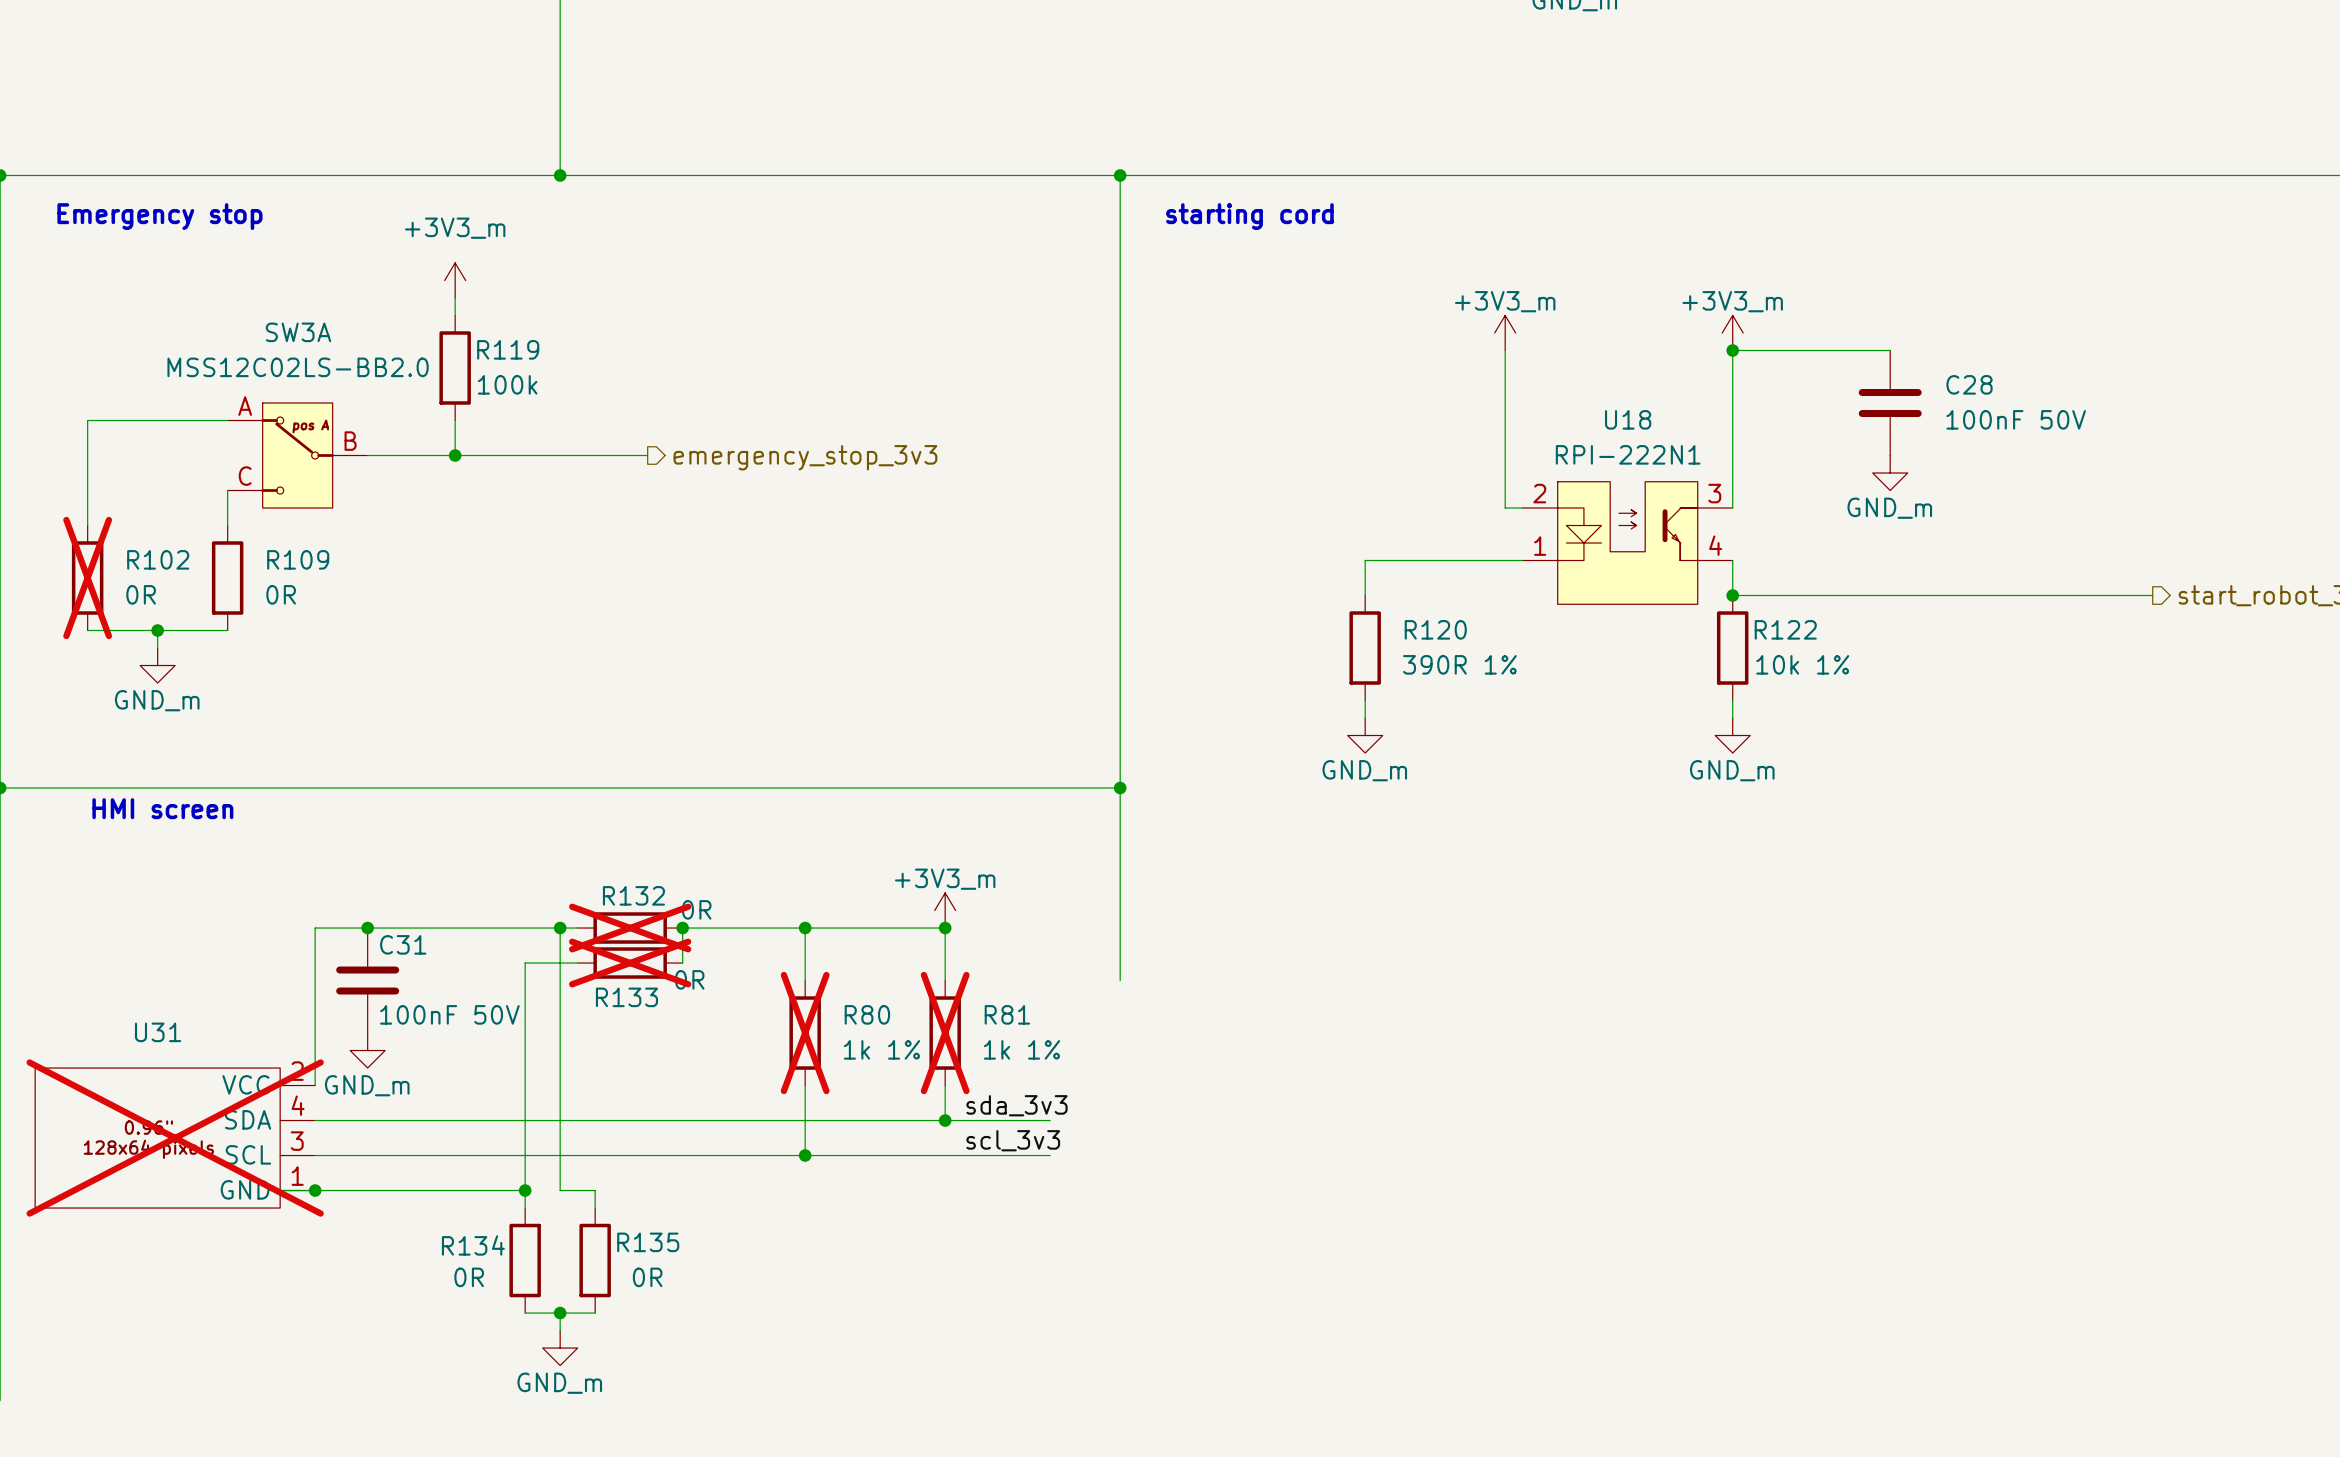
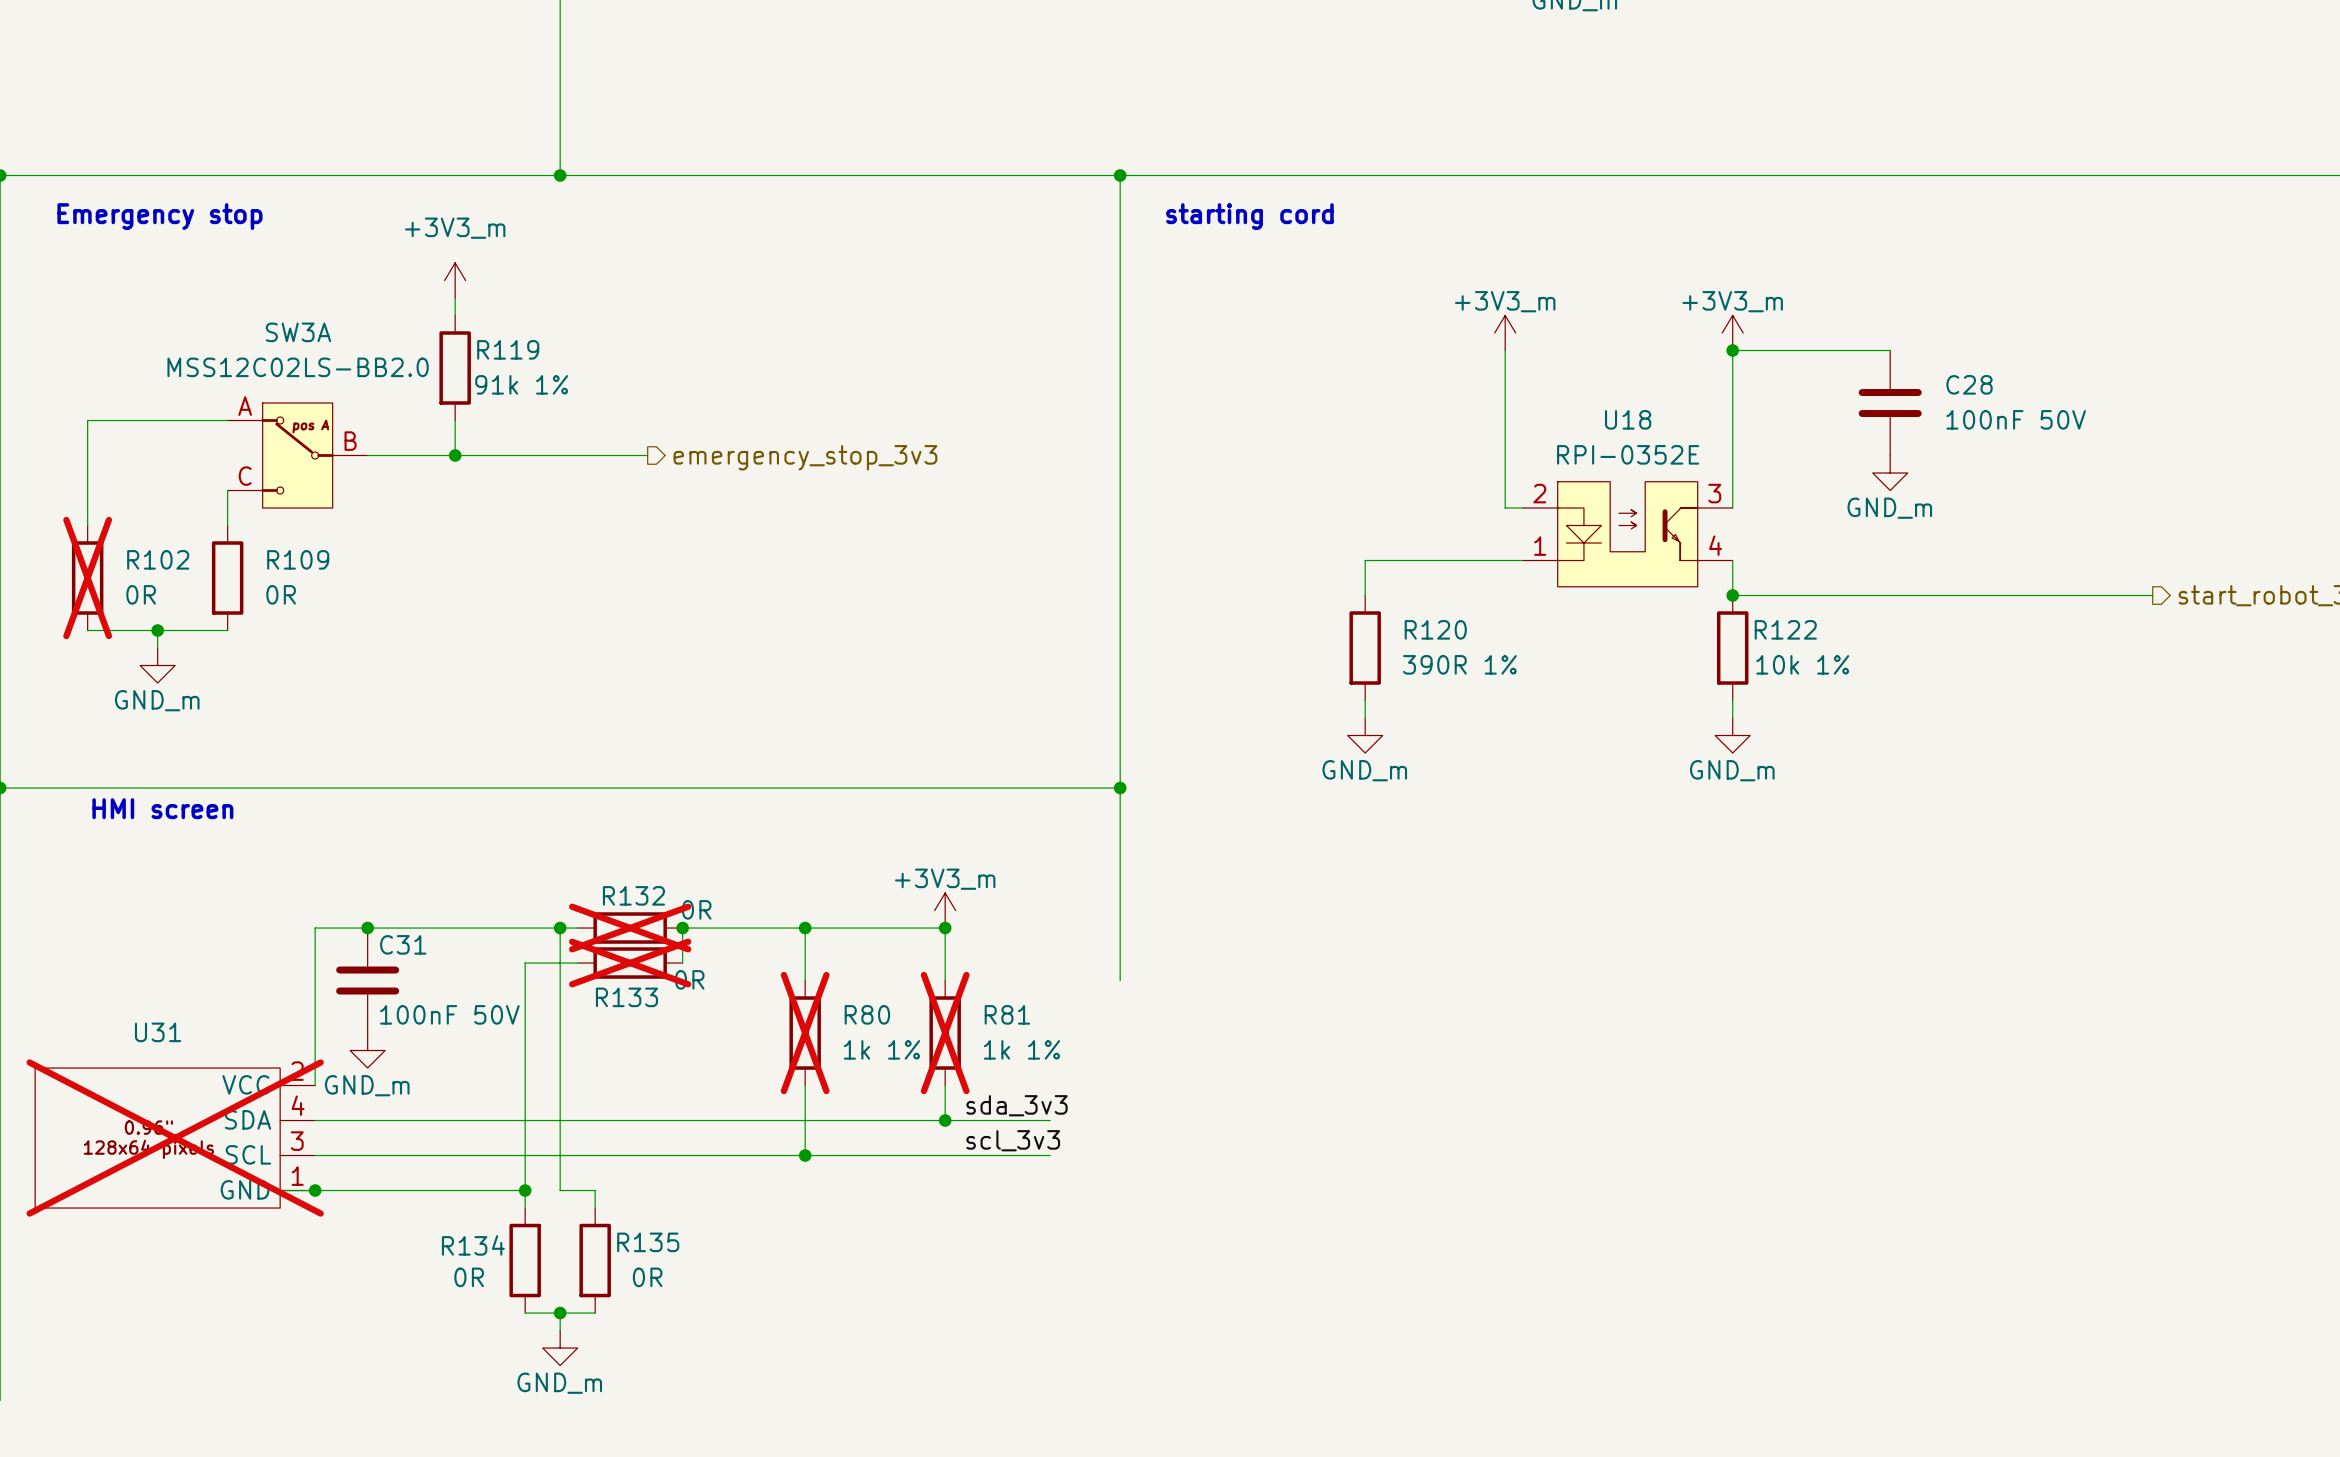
R119 value: 100k (507, 384) -> 91k 1% (521, 384)
U18 value: RPI-222N1 (1628, 454) -> RPI-0352E (1628, 454)
U18 symbol: [1522, 481, 1733, 605] -> [1522, 481, 1733, 587]

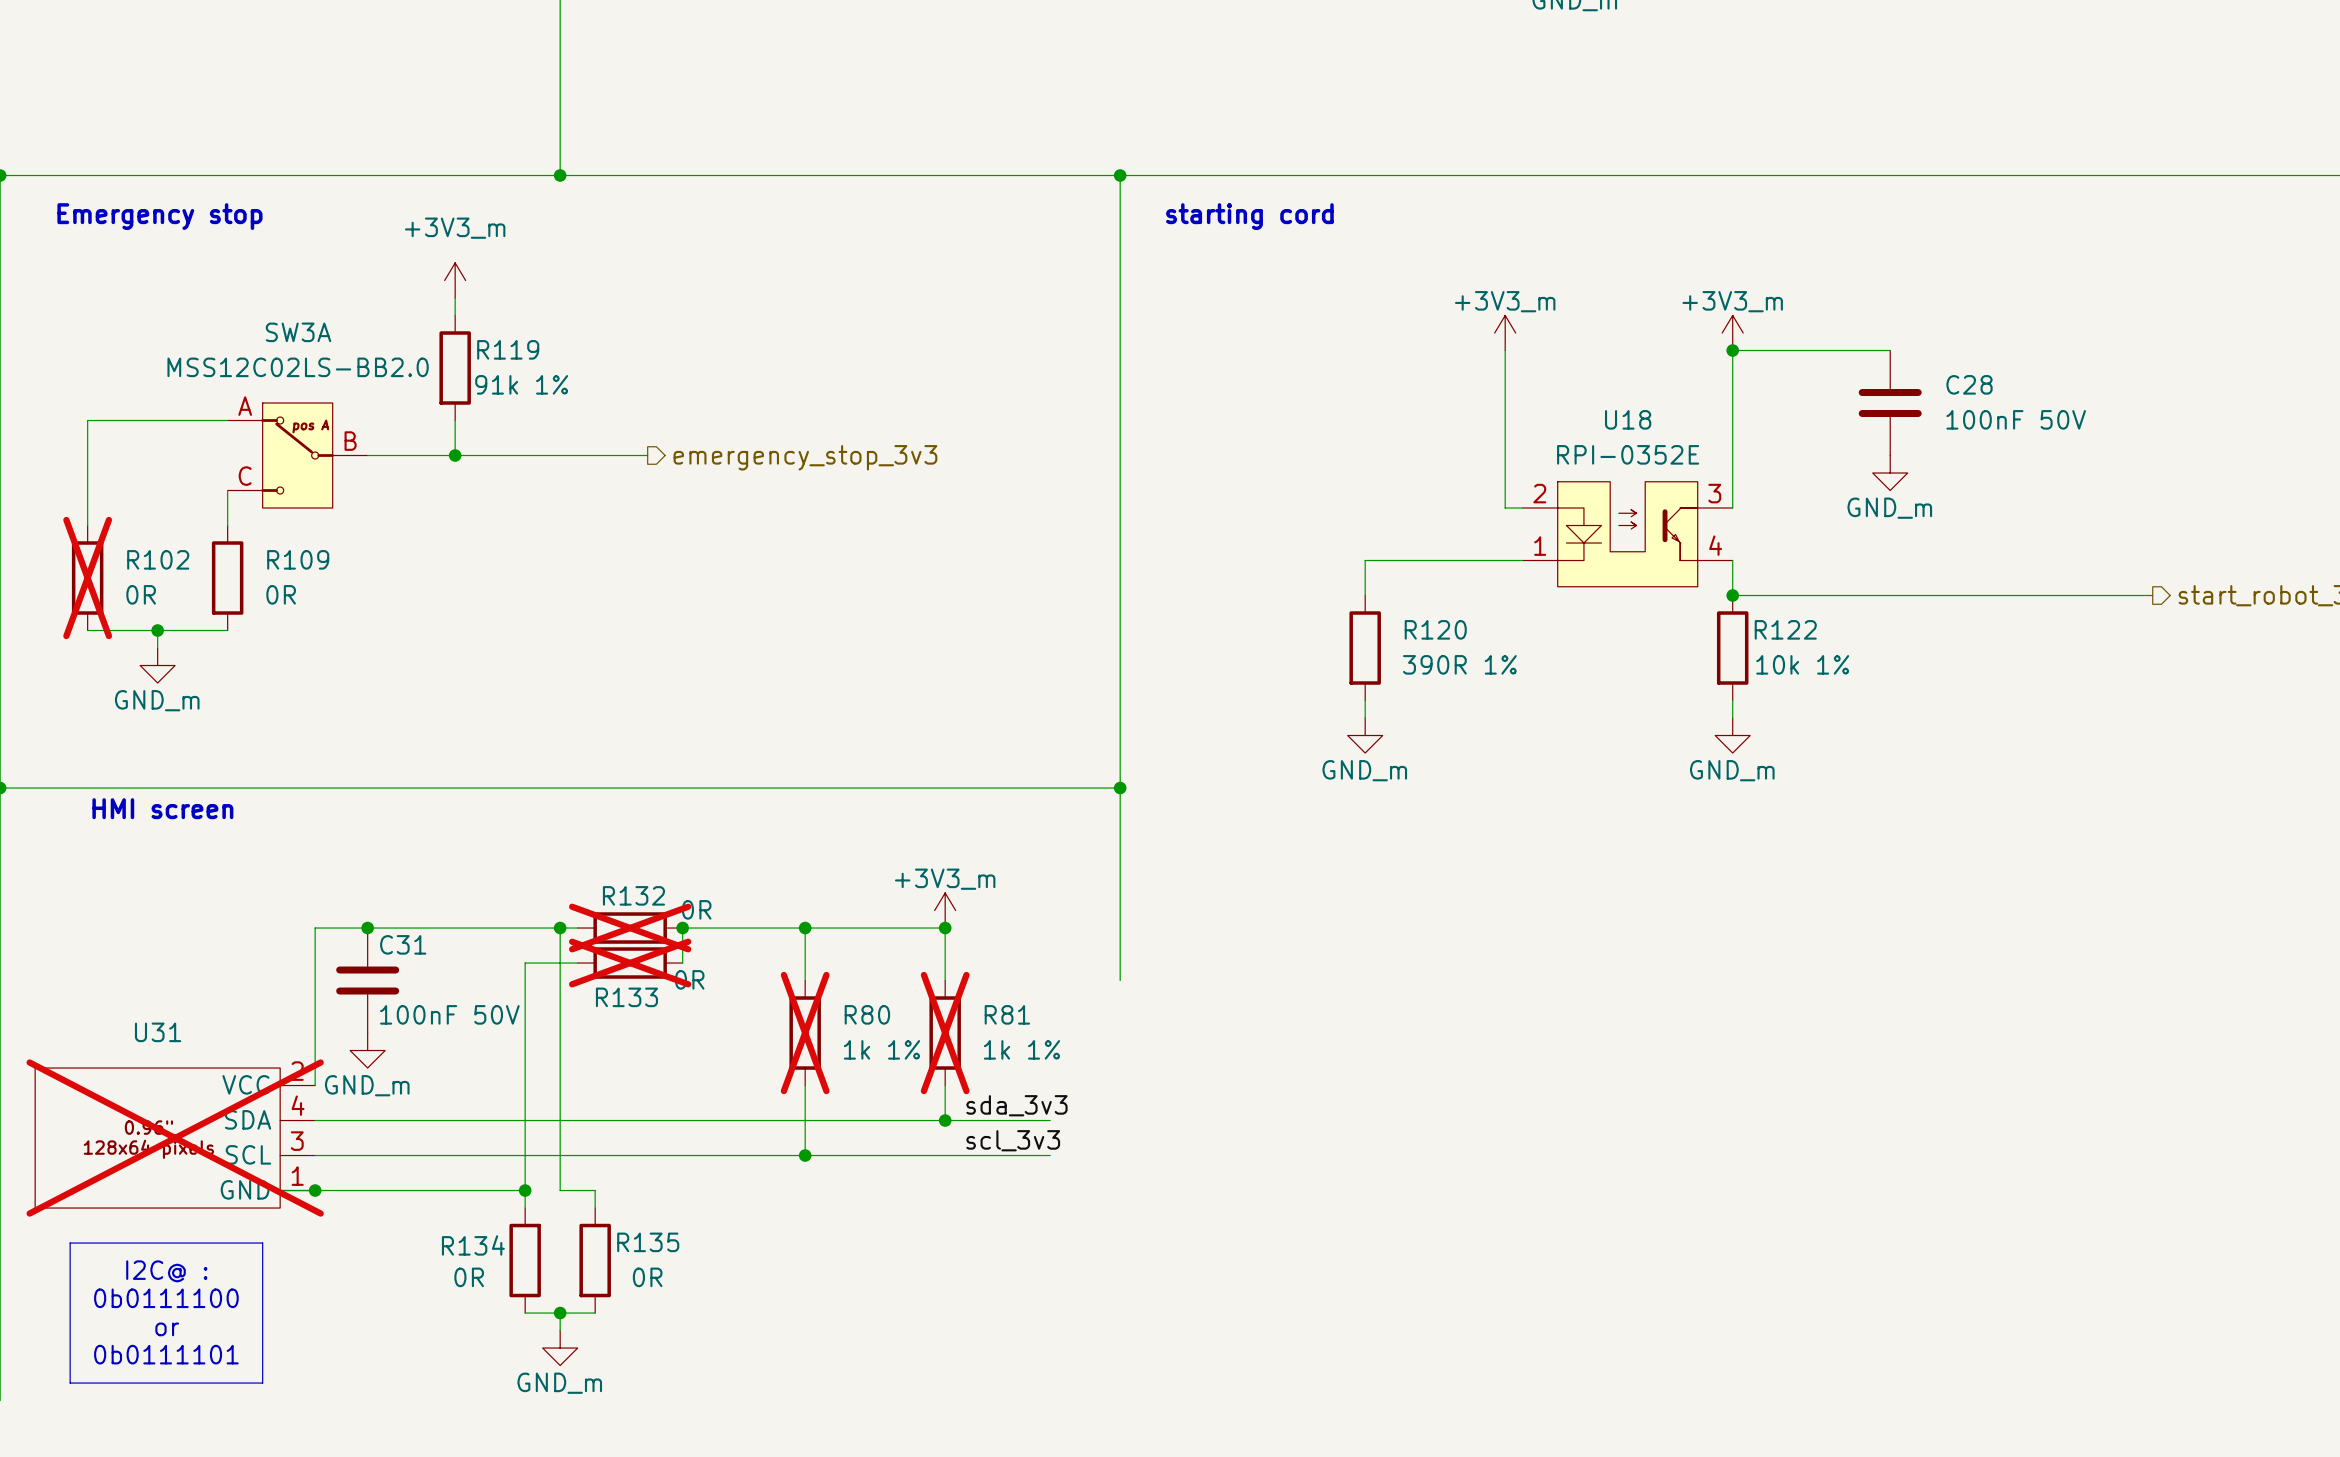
line: none -> (70, 1243) (262, 1243) (262, 1383) (70, 1383) (70, 1243)
text: none -> I2C@ : (166, 1271)
text: none -> 0b0111100 (166, 1298)
text: none -> or (167, 1329)
text: none -> 0b0111101 (166, 1354)

